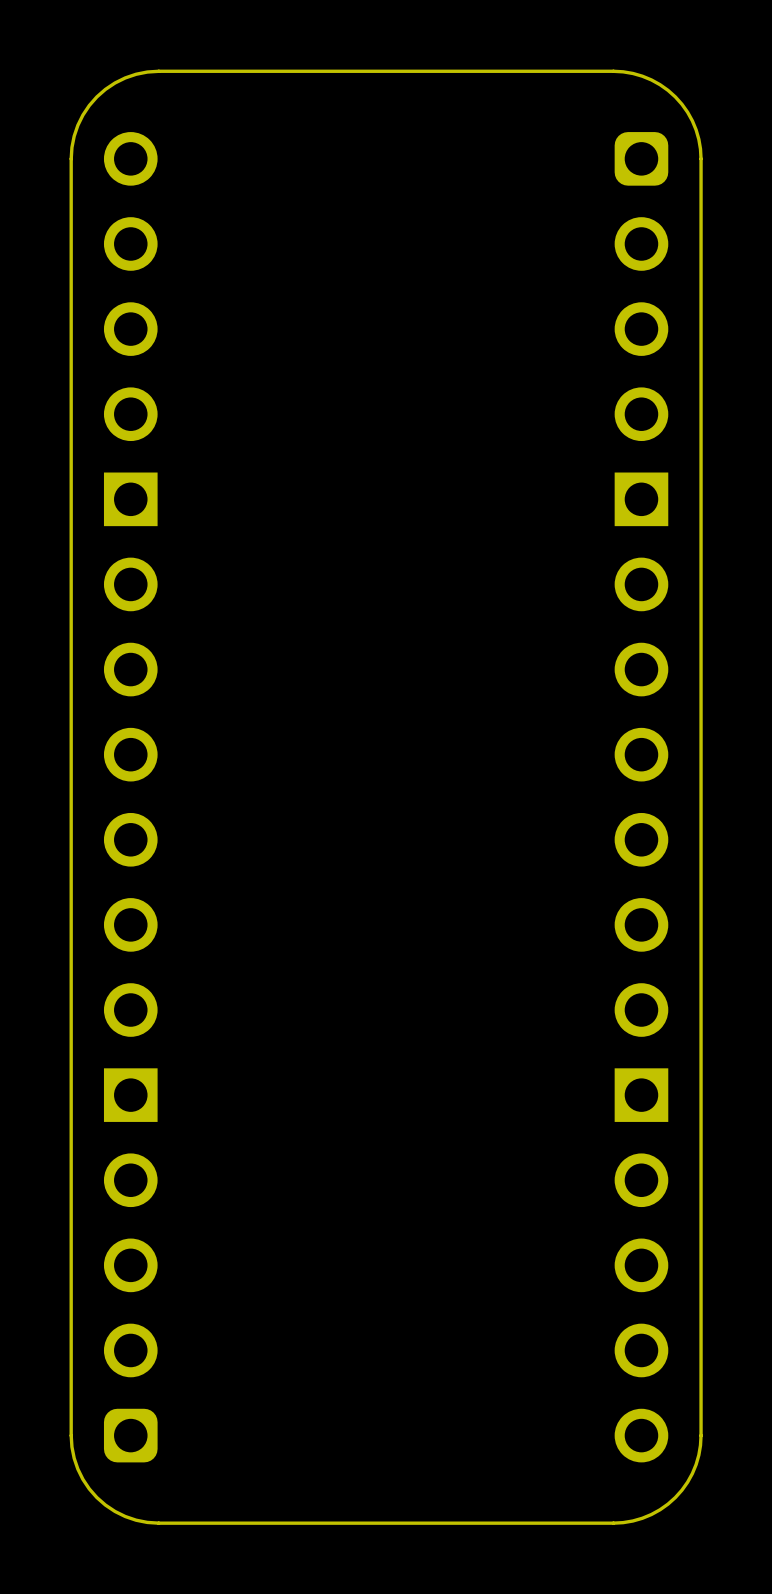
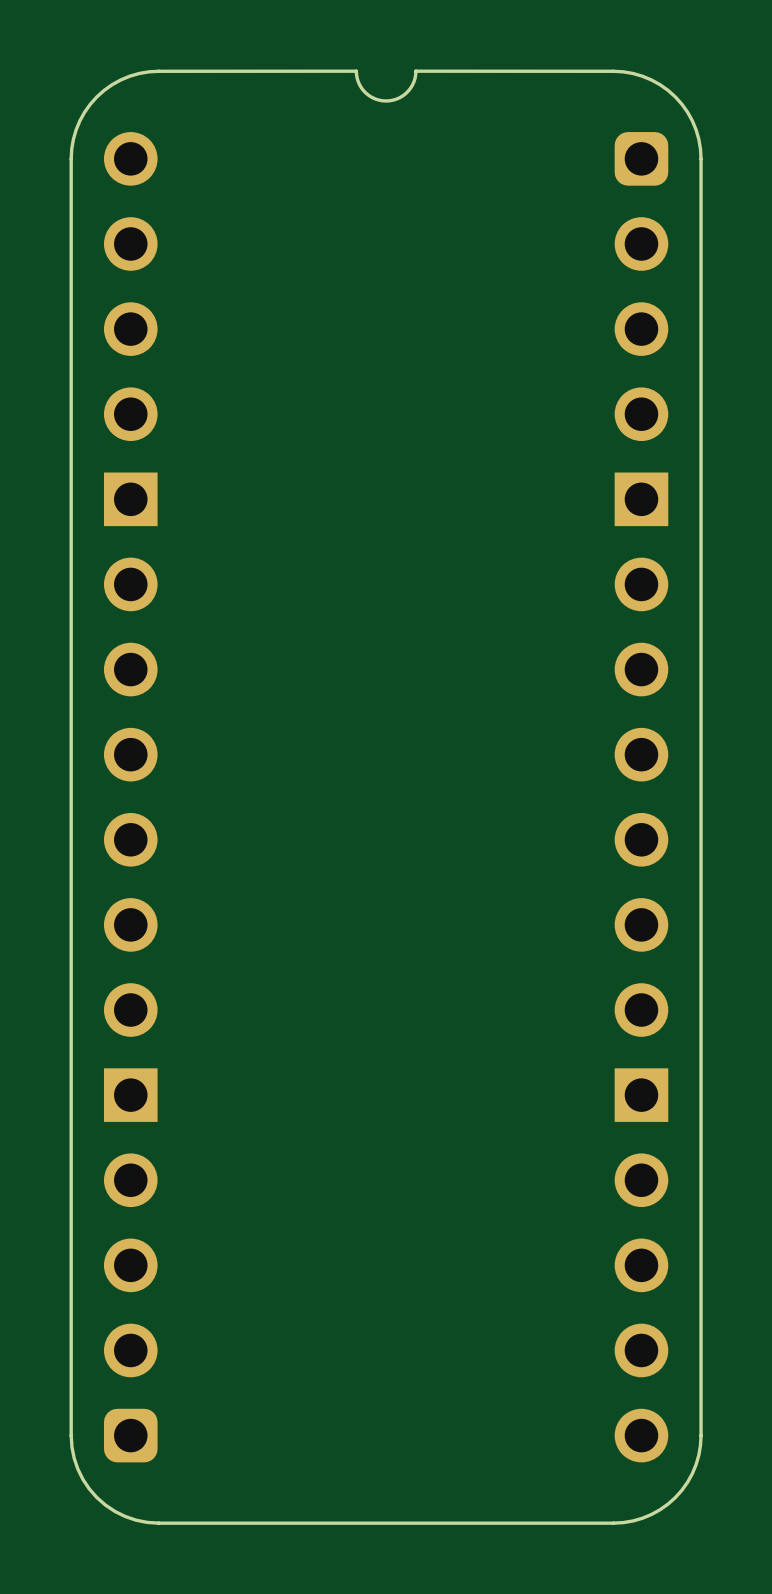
part footprint: [69, 69, 703, 1525] -> [69, 69, 703, 1525]

